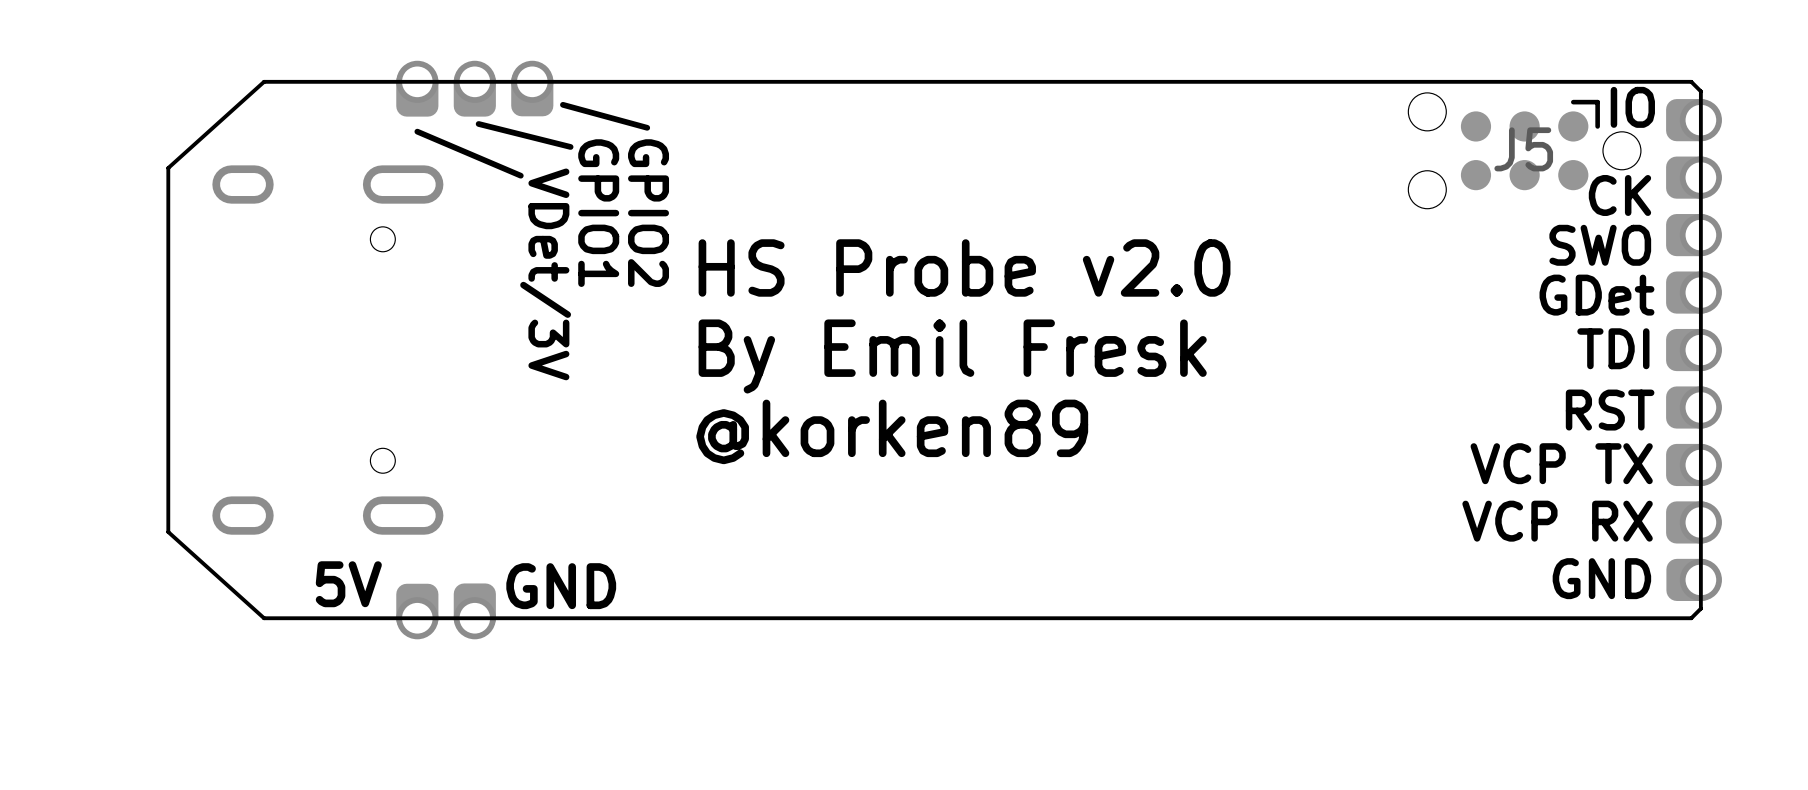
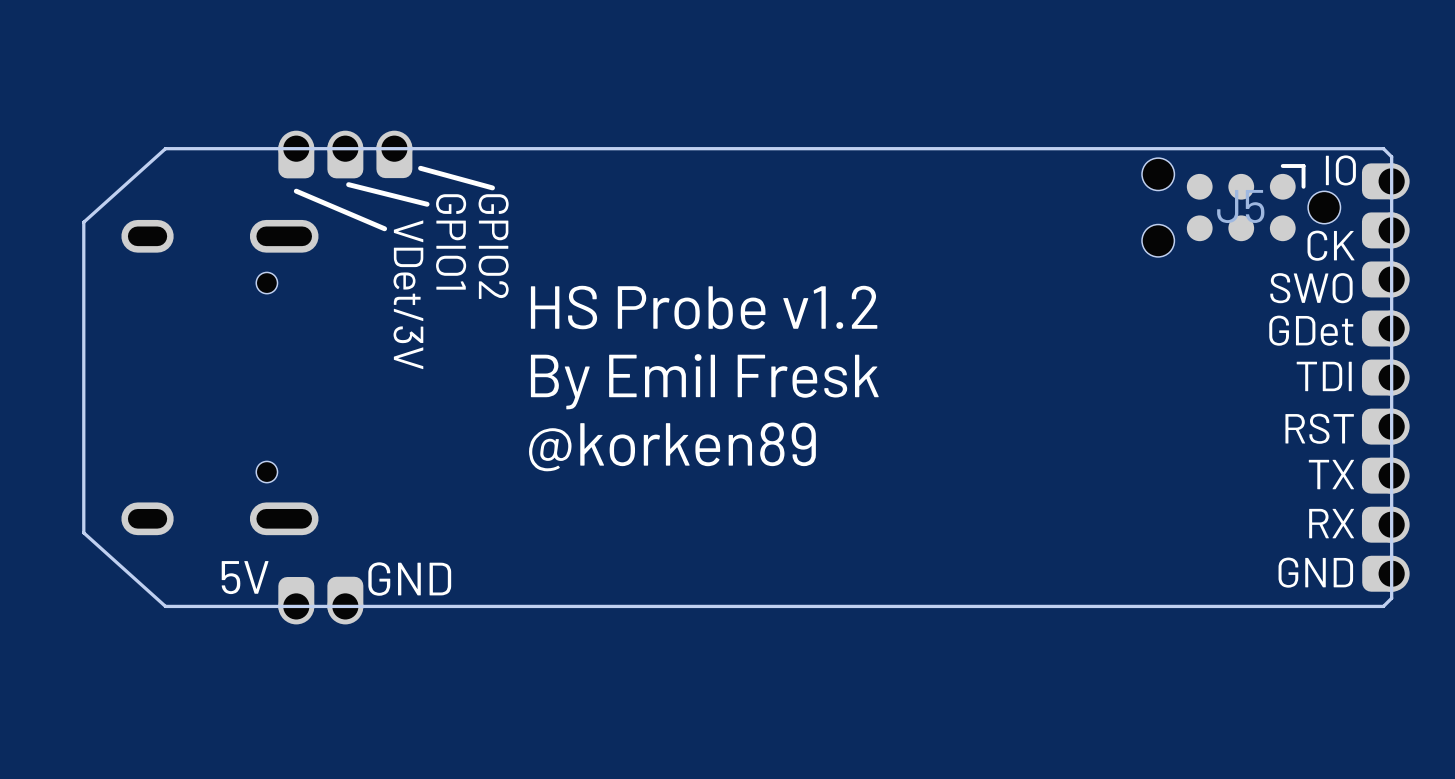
text: HS Probe v2.0 (964, 267) -> HS Probe v1.2 (704, 307)
text: VCP TX (1561, 463) -> TX (1331, 474)
text: VCP RX (1557, 521) -> RX (1331, 523)

